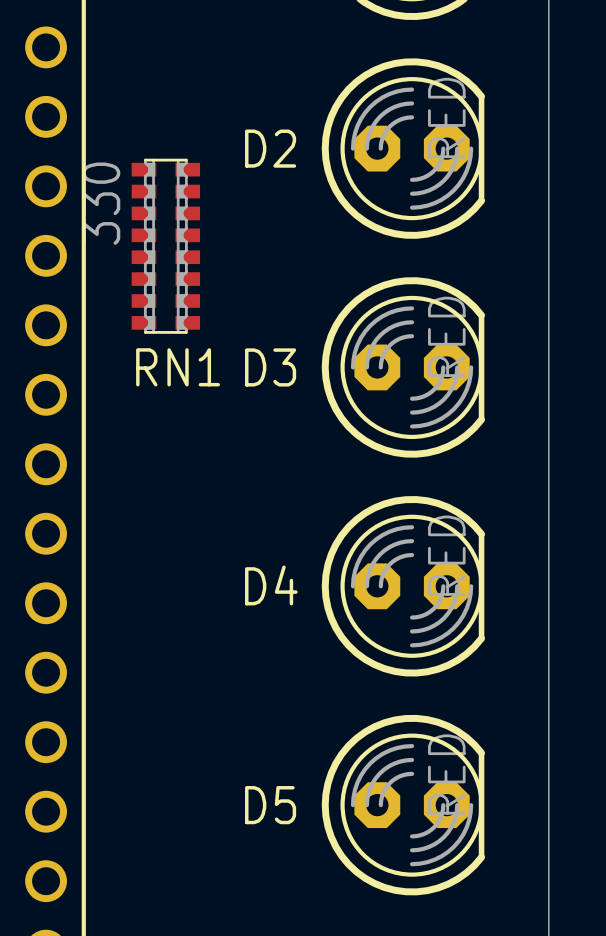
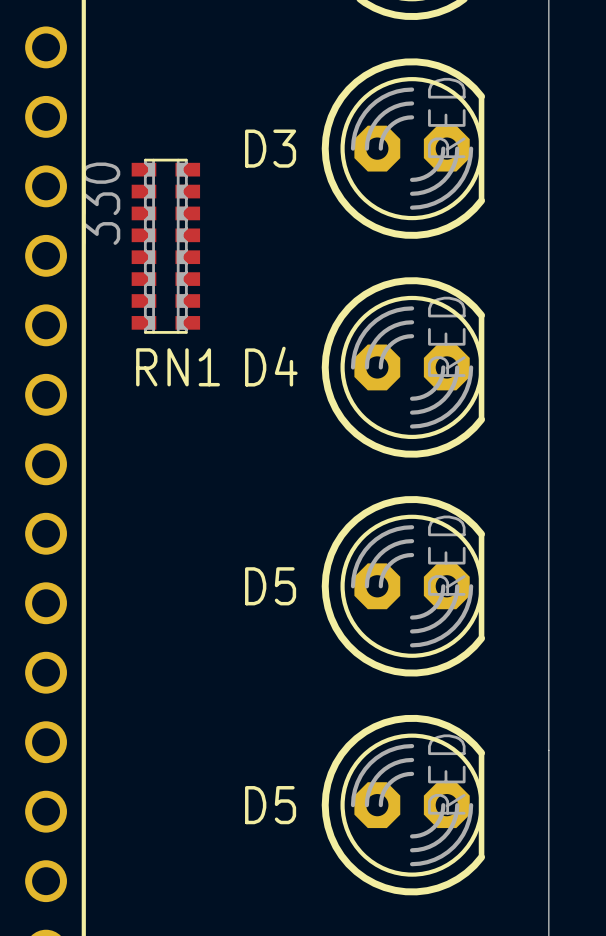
D2 name: D2 (270, 148) -> D3 (270, 148)
D3 name: D3 (270, 367) -> D4 (271, 366)
D4 name: D4 (271, 585) -> D5 (270, 586)

